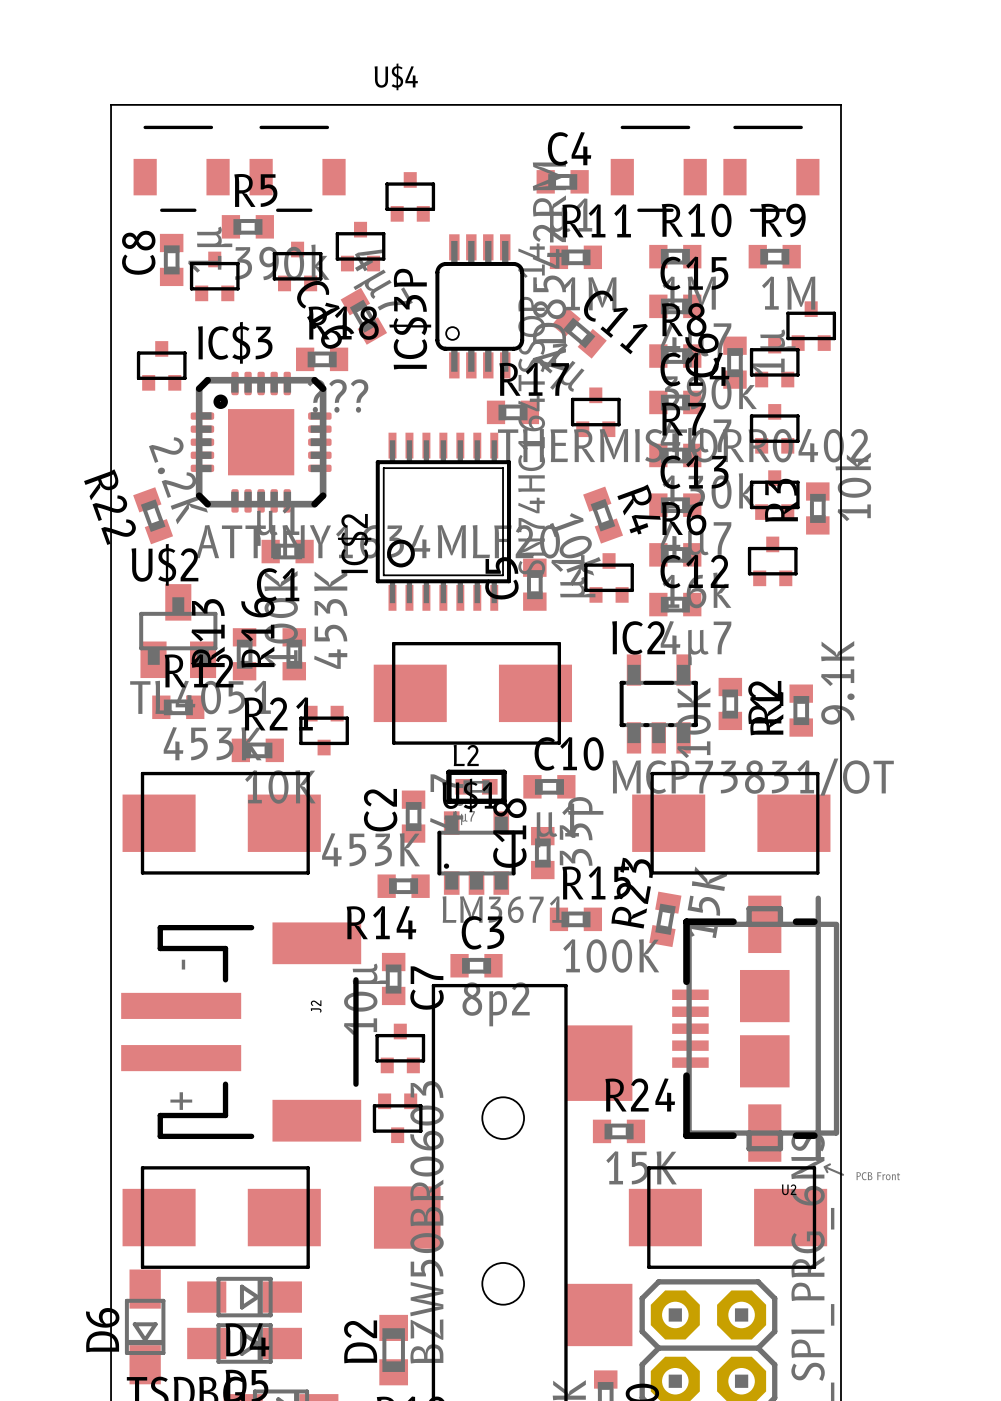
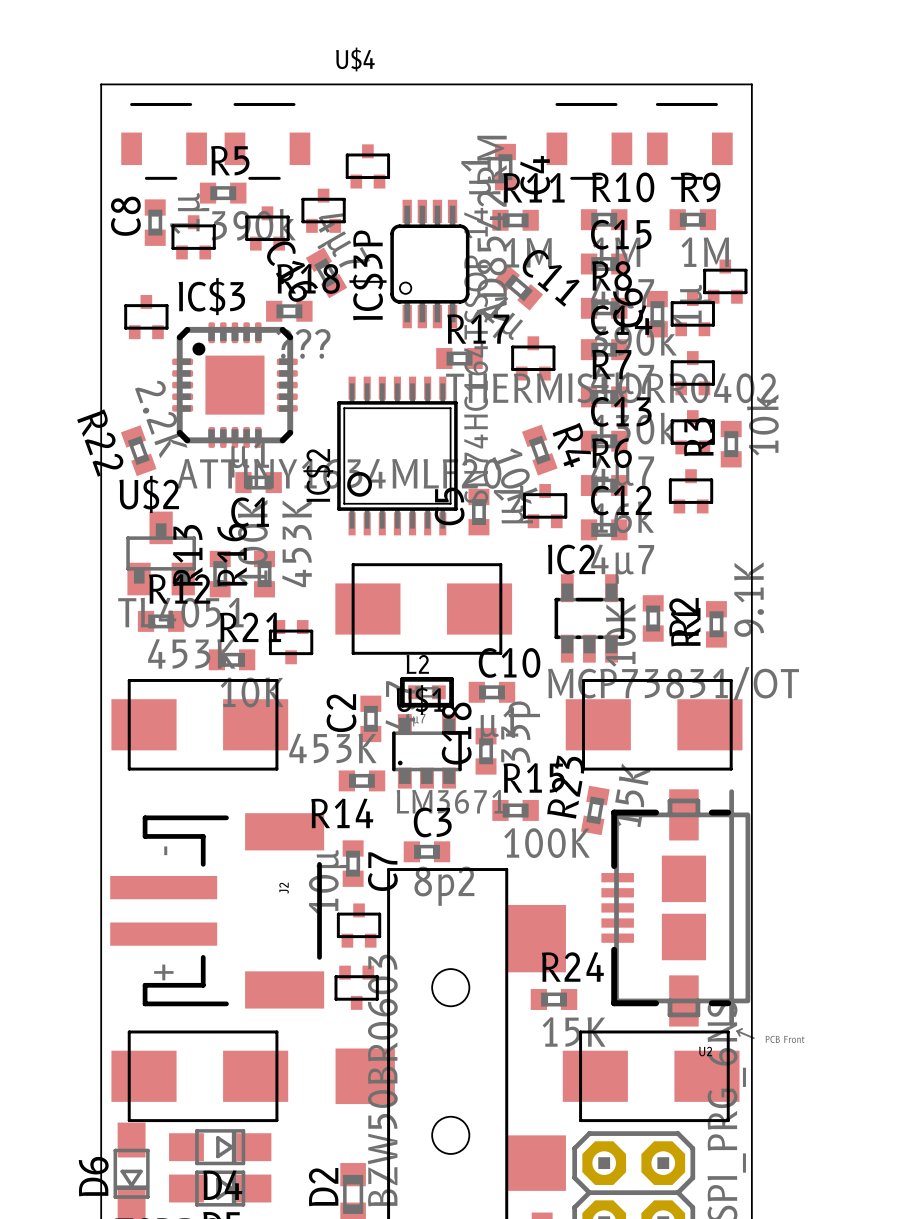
C4 rotation: 0° (562, 181) -> 90° clockwise (505, 167)

